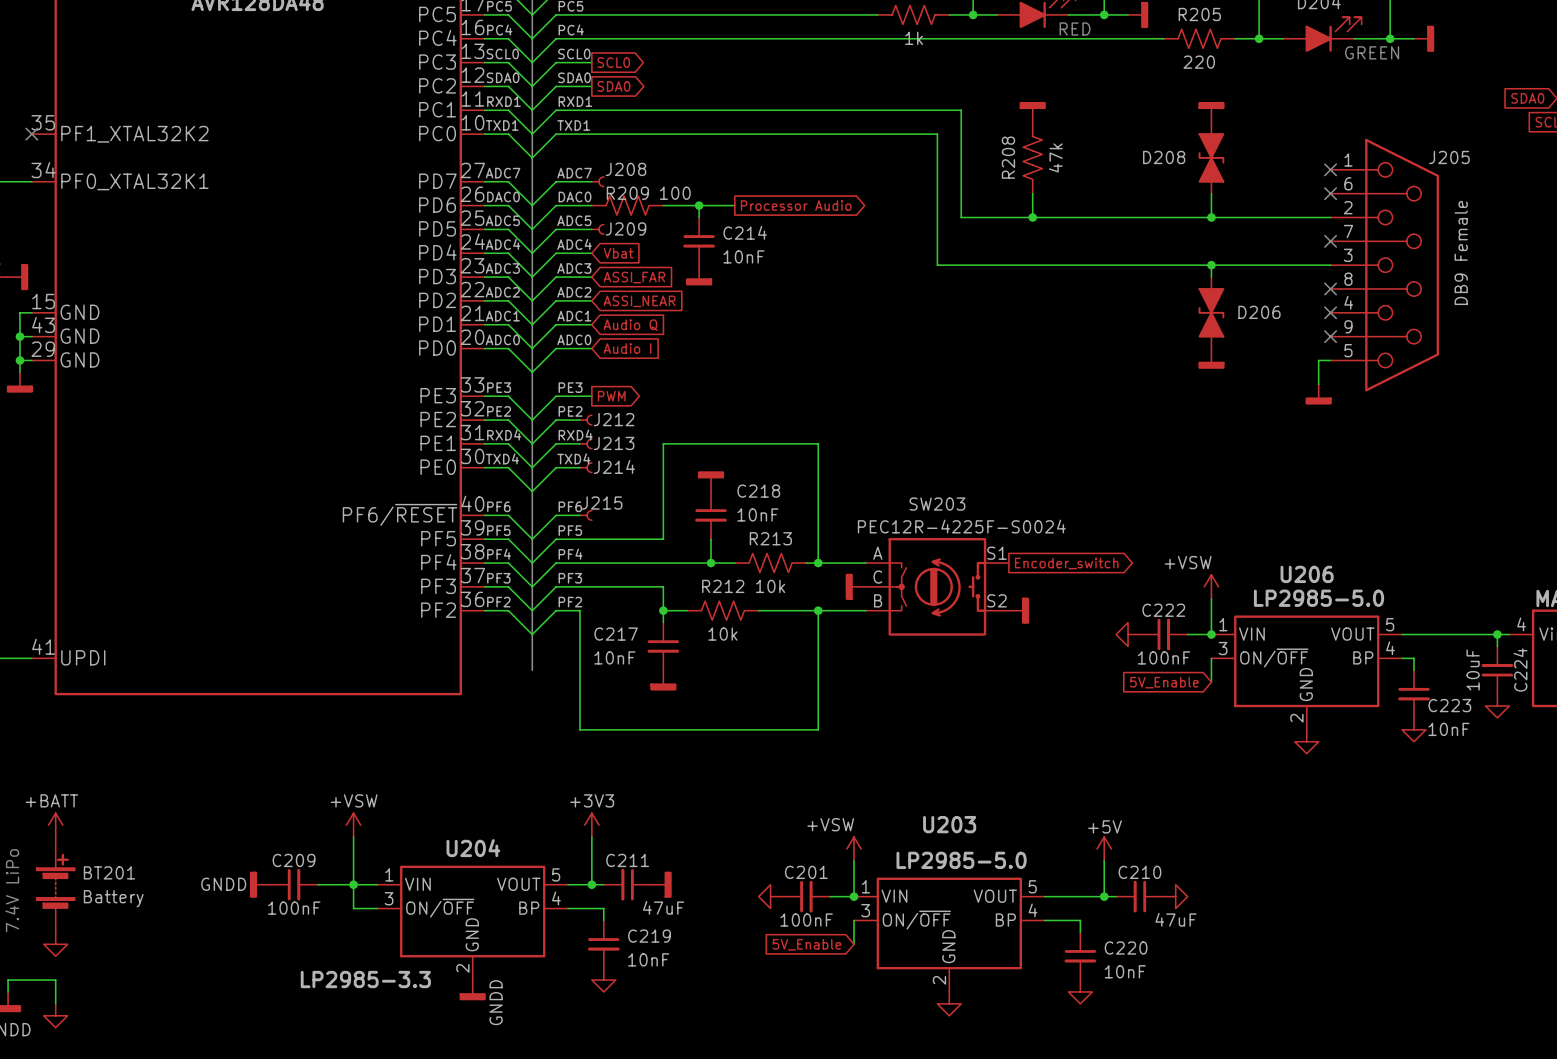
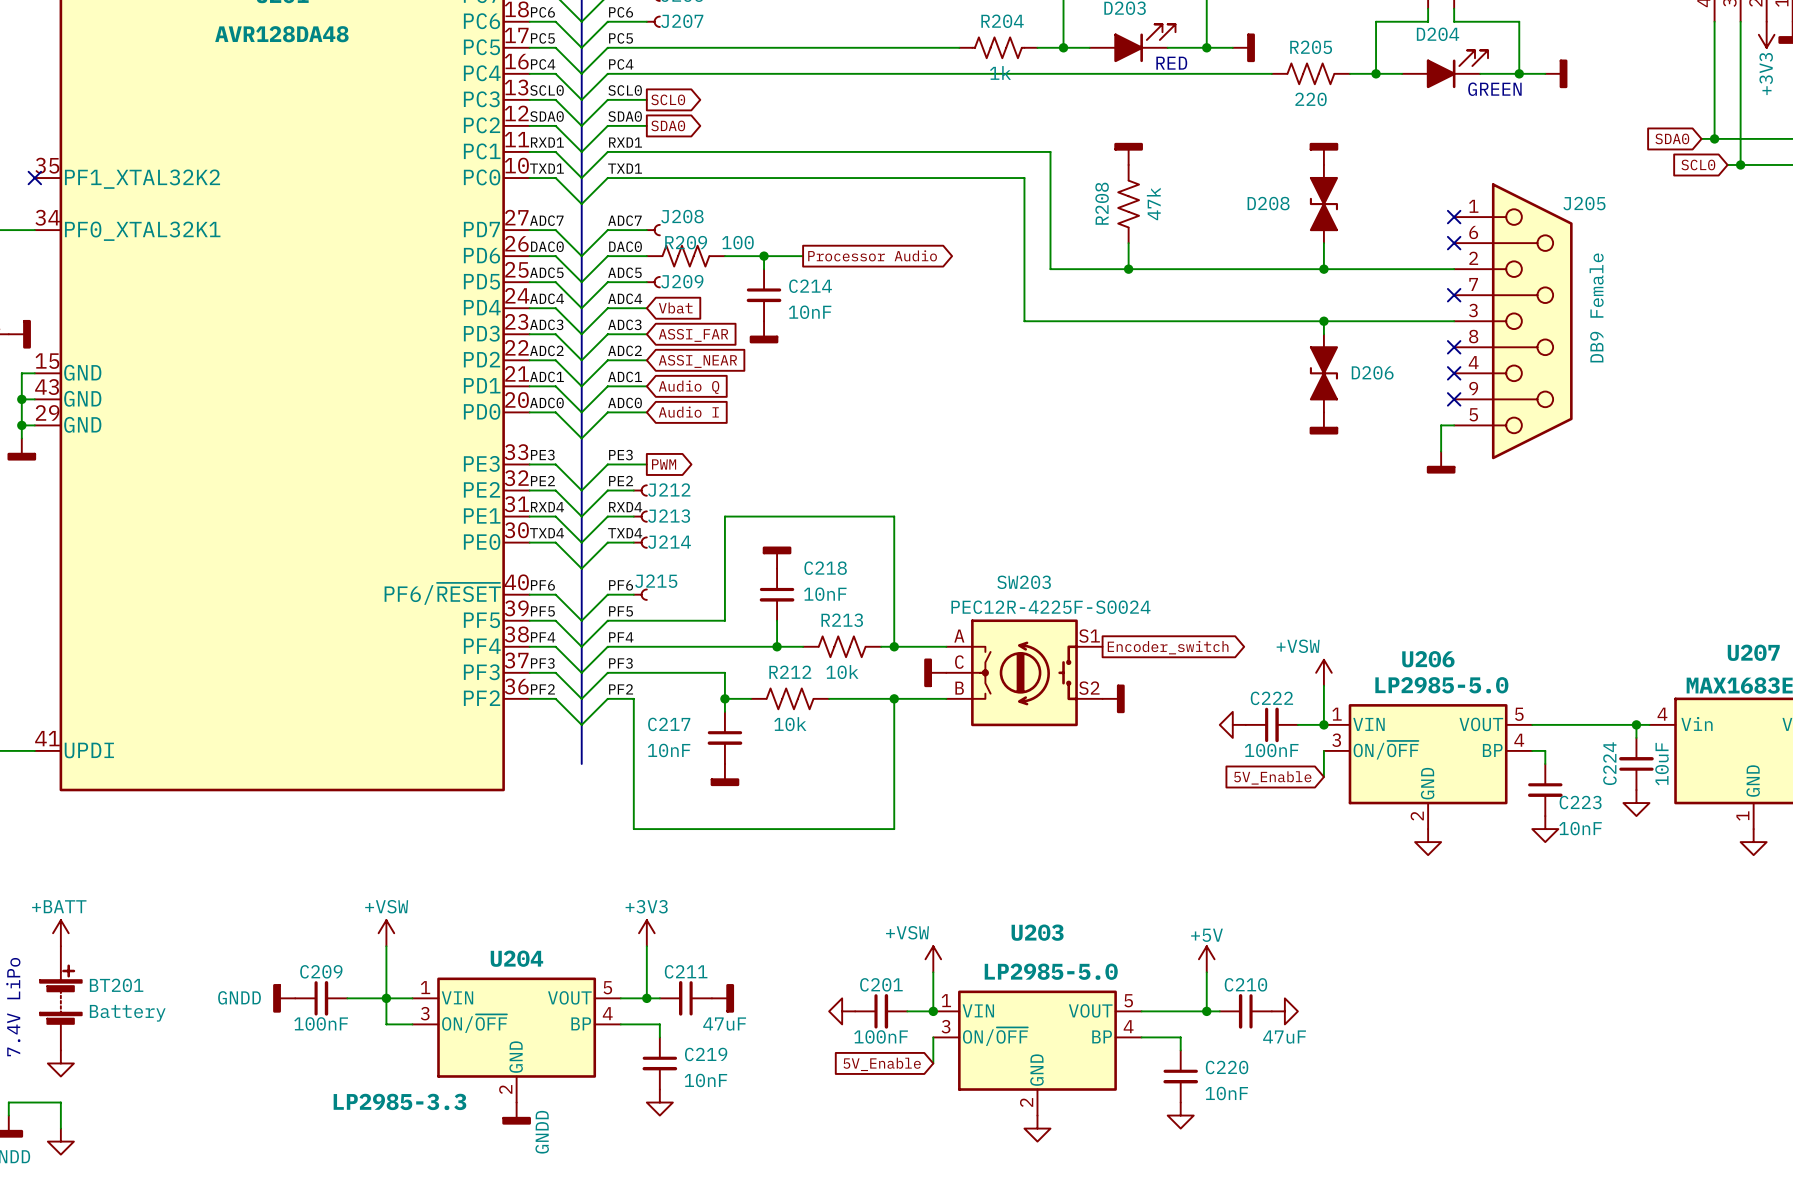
C224 value position: 10uF (1473, 669) -> 10uF (1662, 764)
C224 name position: C224 (1520, 669) -> C224 (1609, 763)

